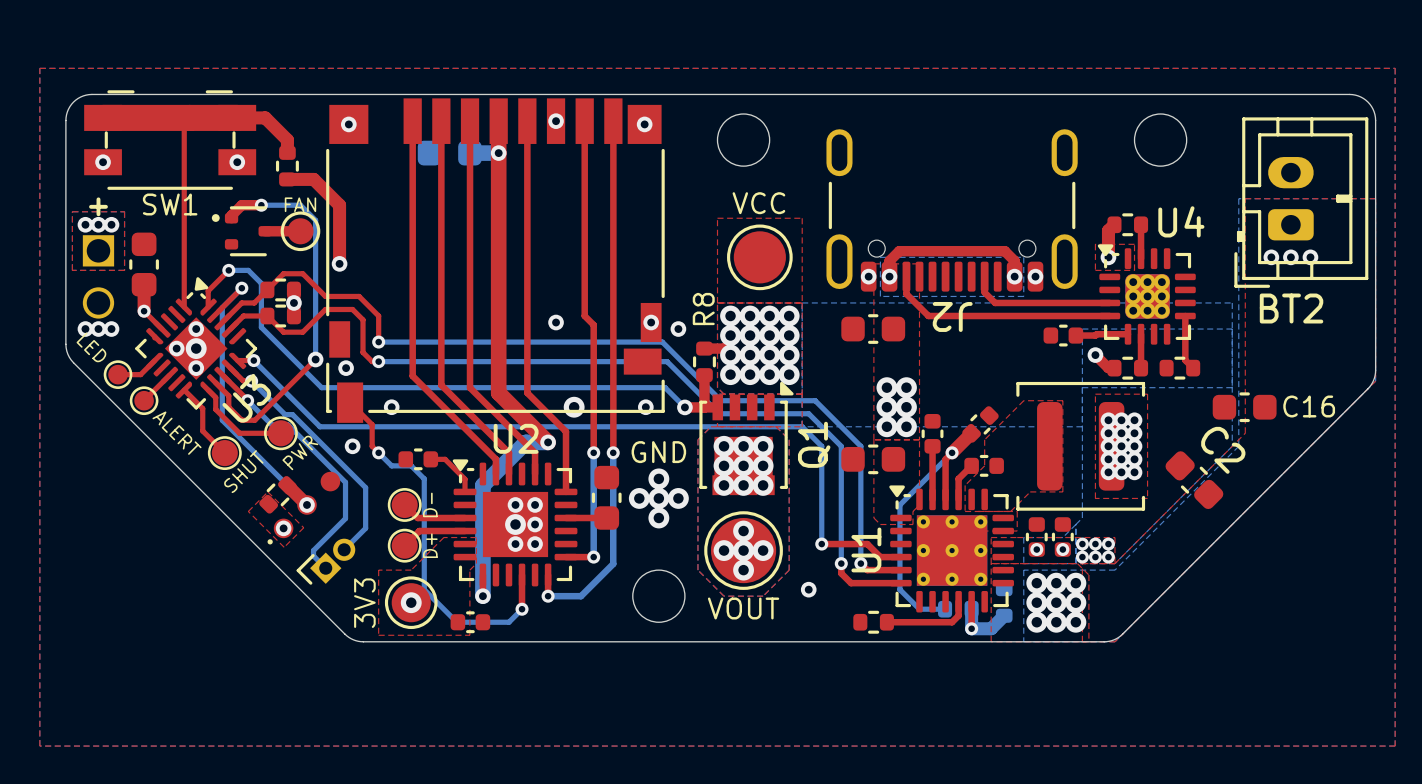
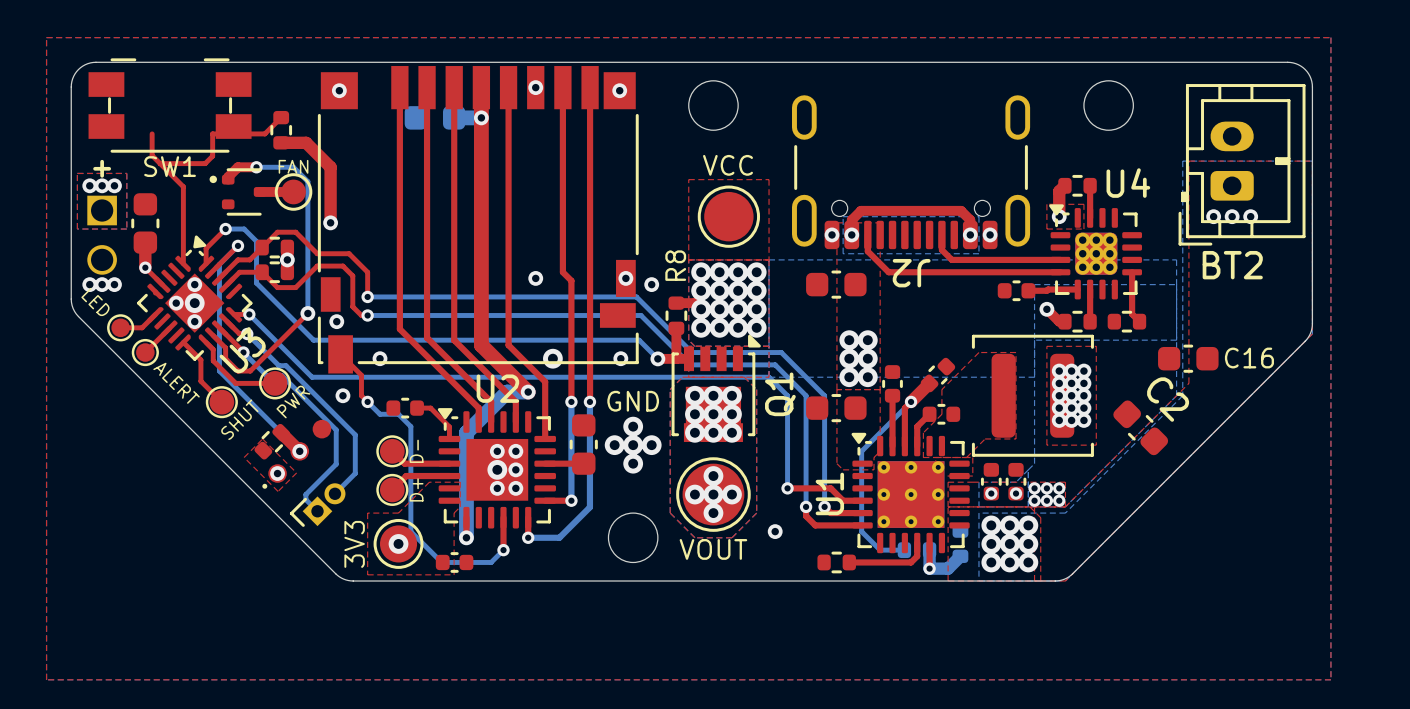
top track: (103, 117) (265, 117) (287, 140) (287, 152) -> (160, 163) (205, 163) (212, 156) (212, 133) (264, 133) (281, 117)
top track: (189, 117) (184, 123) (184, 225) -> (152, 133) (152, 155) (183, 186)
via: (103, 162) -> none
via: (237, 162) -> none

